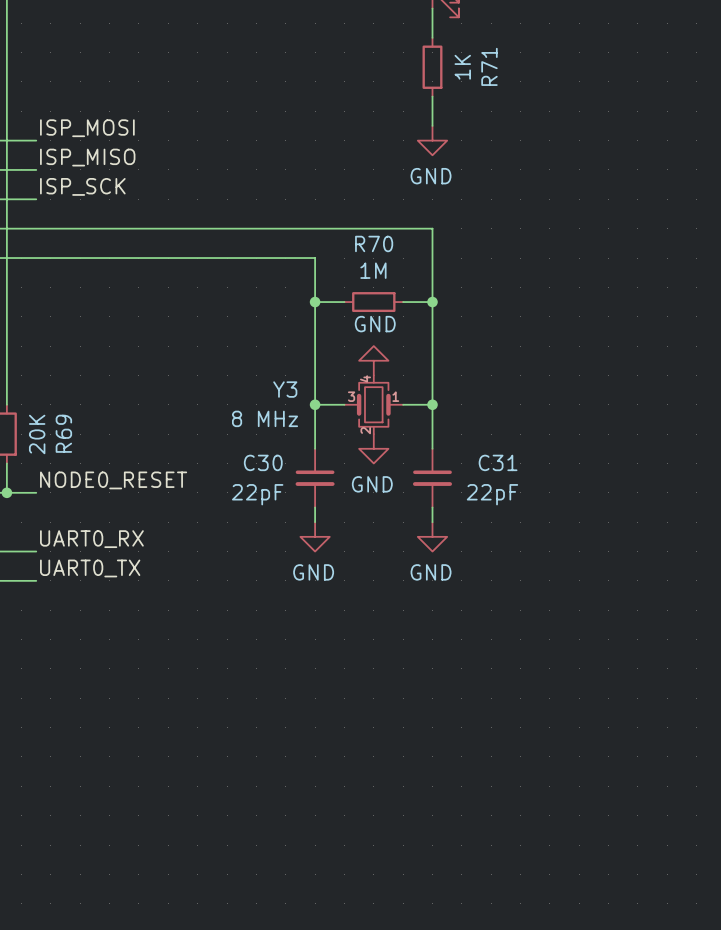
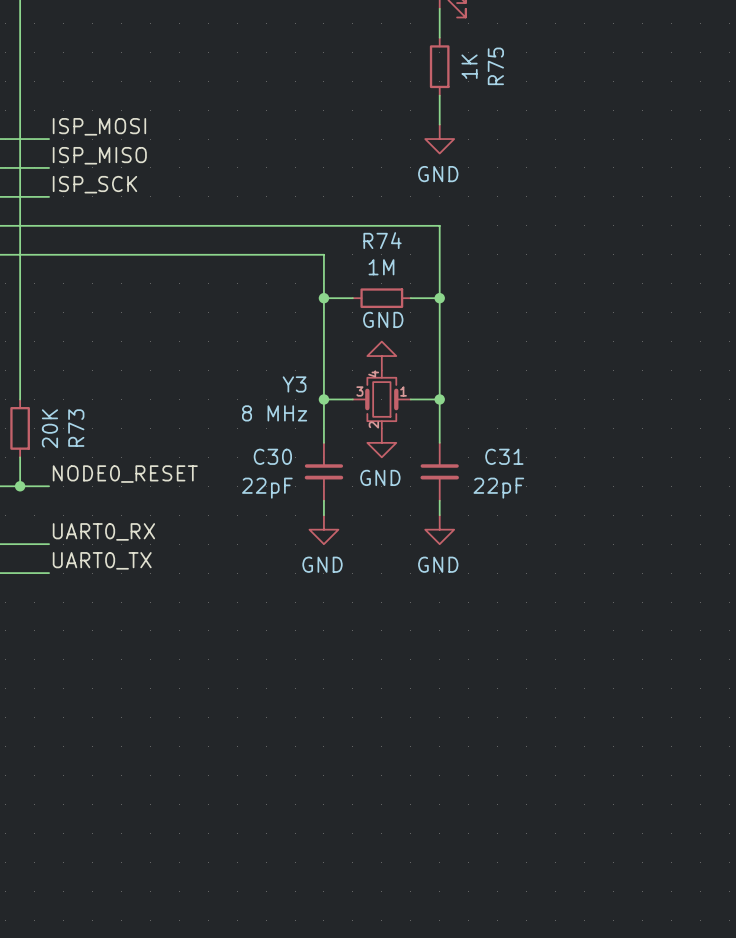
R71 name: R71 (489, 66) -> R75 (495, 66)
R70 name: R70 (374, 243) -> R74 (382, 240)
R69 name: R69 (63, 433) -> R73 (76, 428)

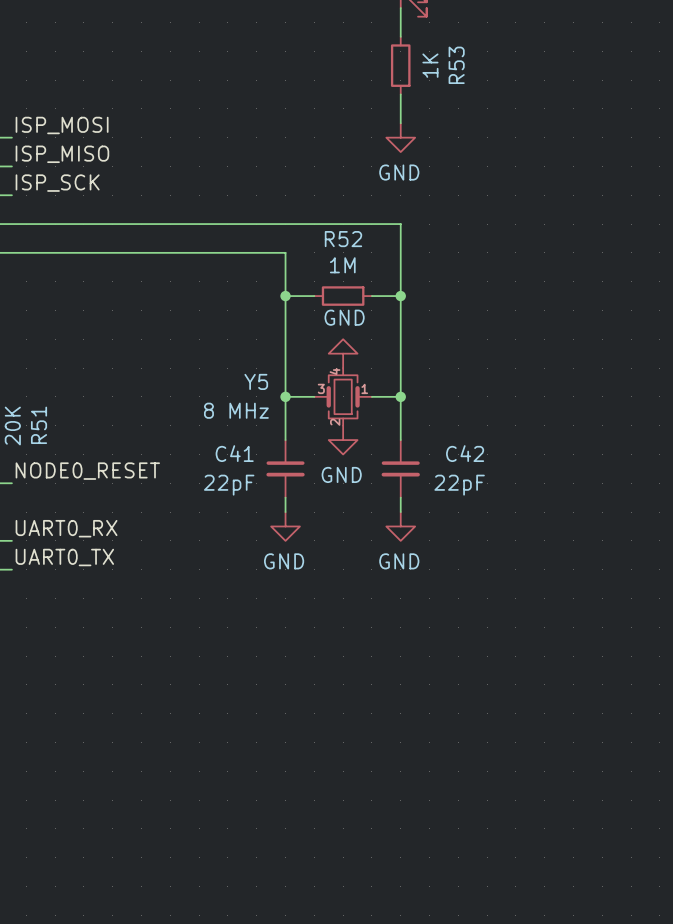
R75 name: R75 (495, 66) -> R53 (456, 65)
R74 name: R74 (382, 240) -> R52 (343, 239)
Y3 name: Y3 (294, 384) -> Y5 (256, 381)
R73 name: R73 (76, 428) -> R51 (39, 425)
C30 name: C30 (272, 456) -> C41 (234, 453)
C31 name: C31 (504, 456) -> C42 (465, 453)

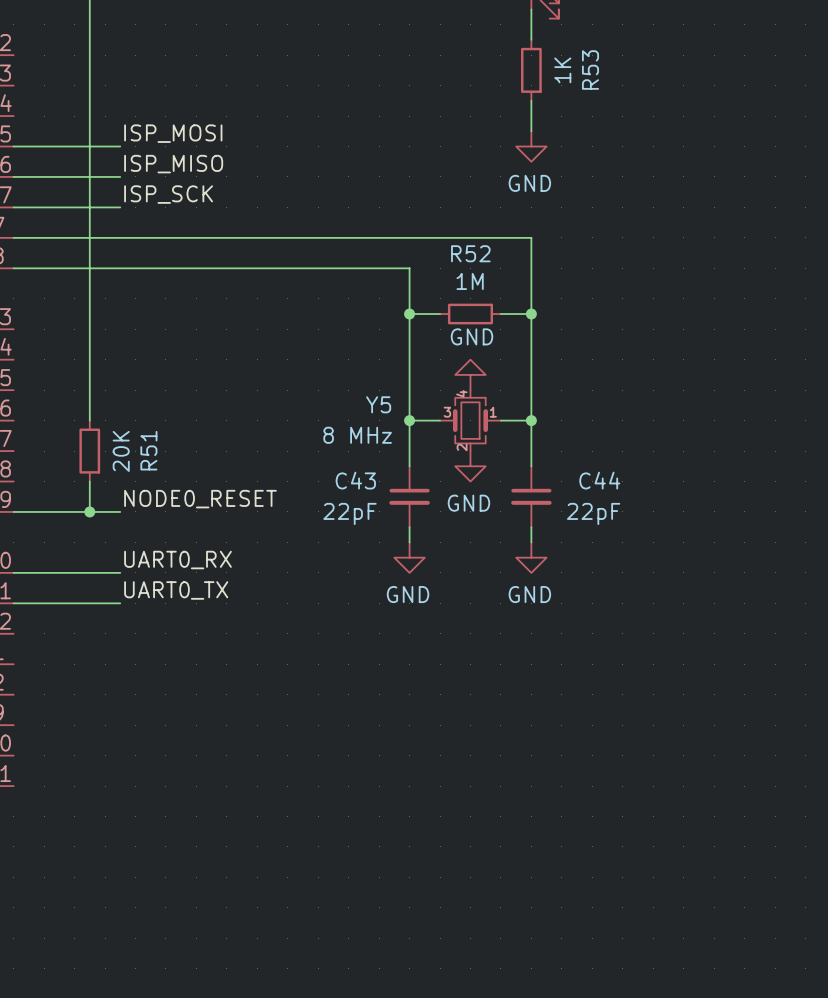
C41 name: C41 (234, 453) -> C43 (355, 480)
C42 name: C42 (465, 453) -> C44 (599, 480)

